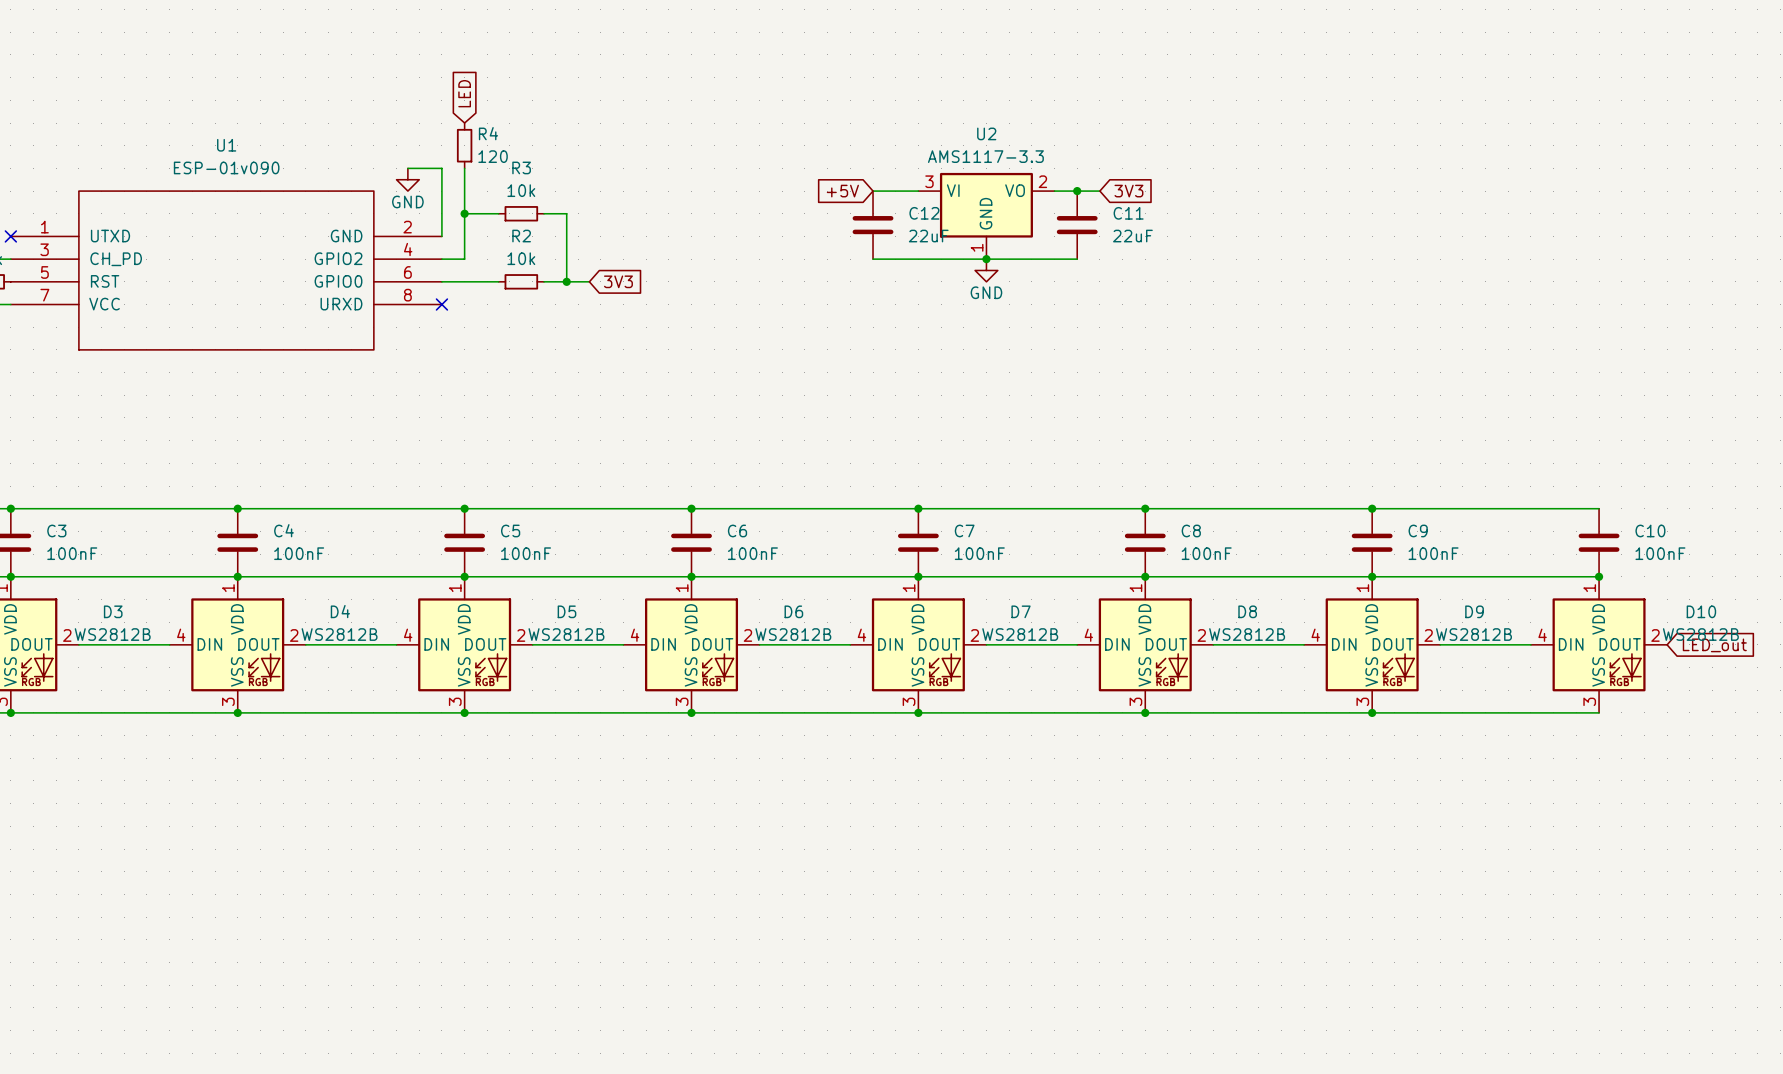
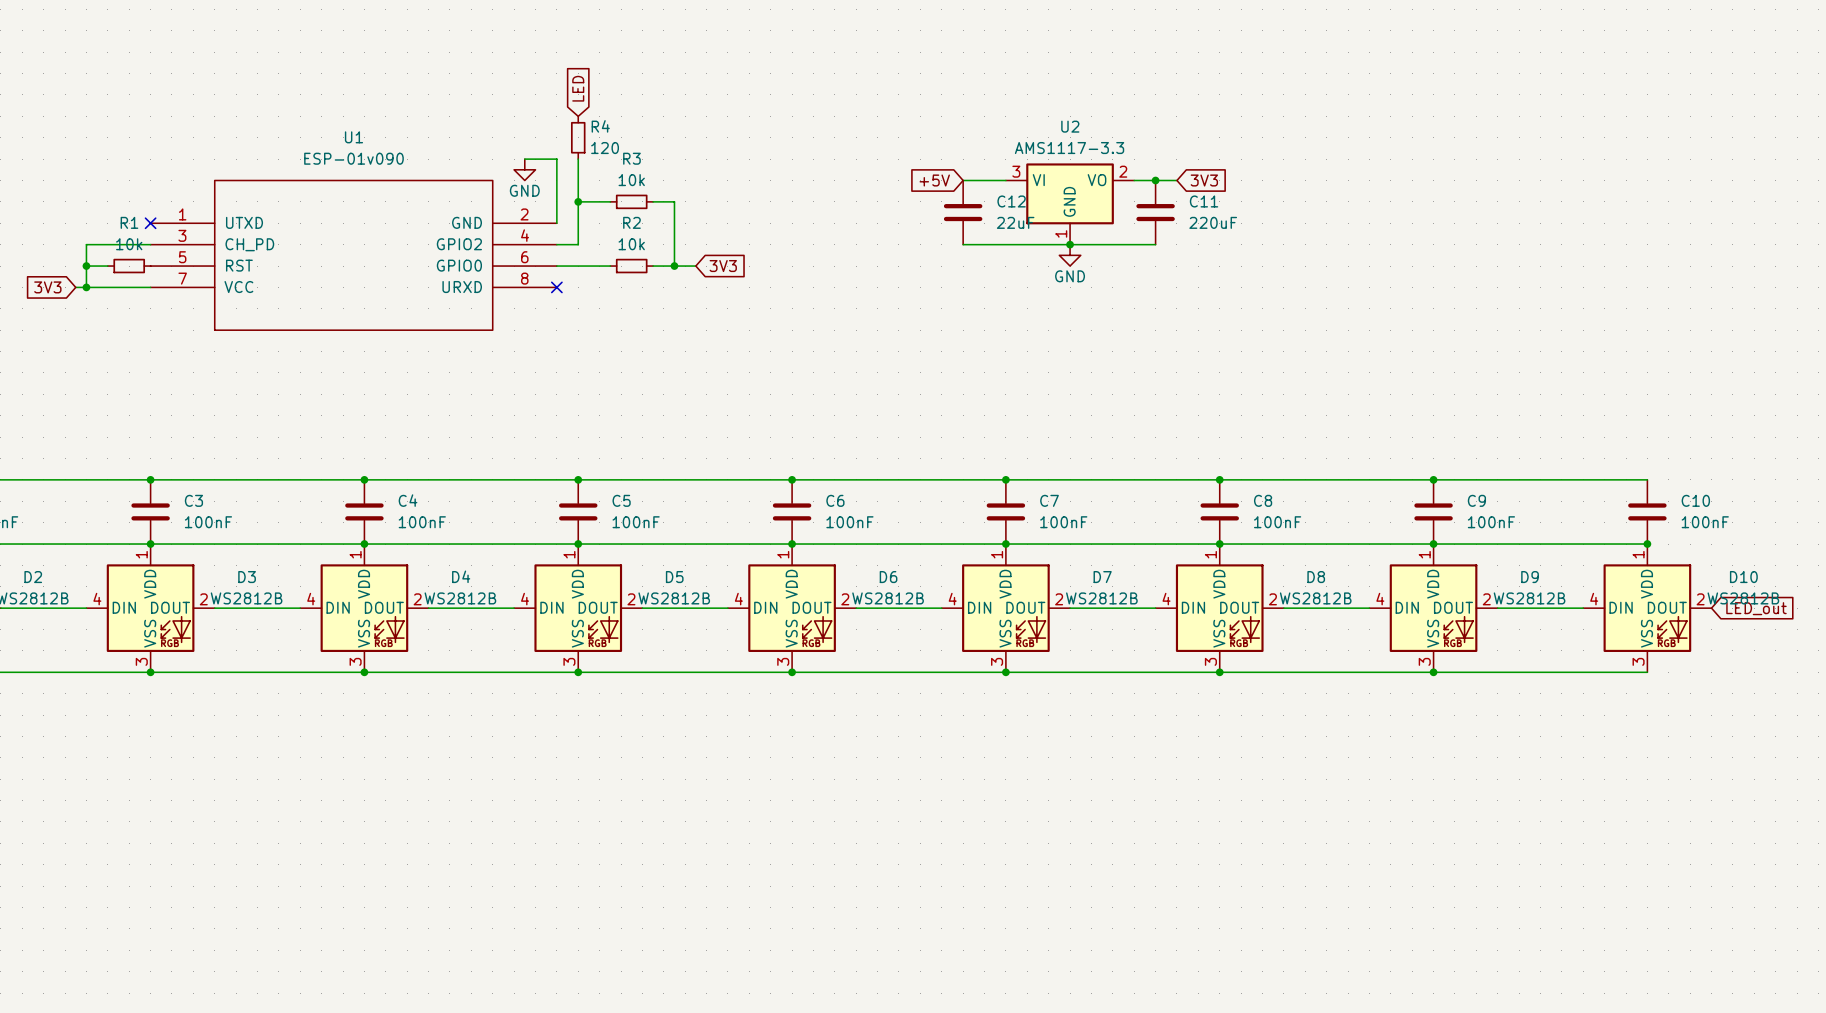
C11 value: 22uF (1132, 236) -> 220uF (1213, 222)

